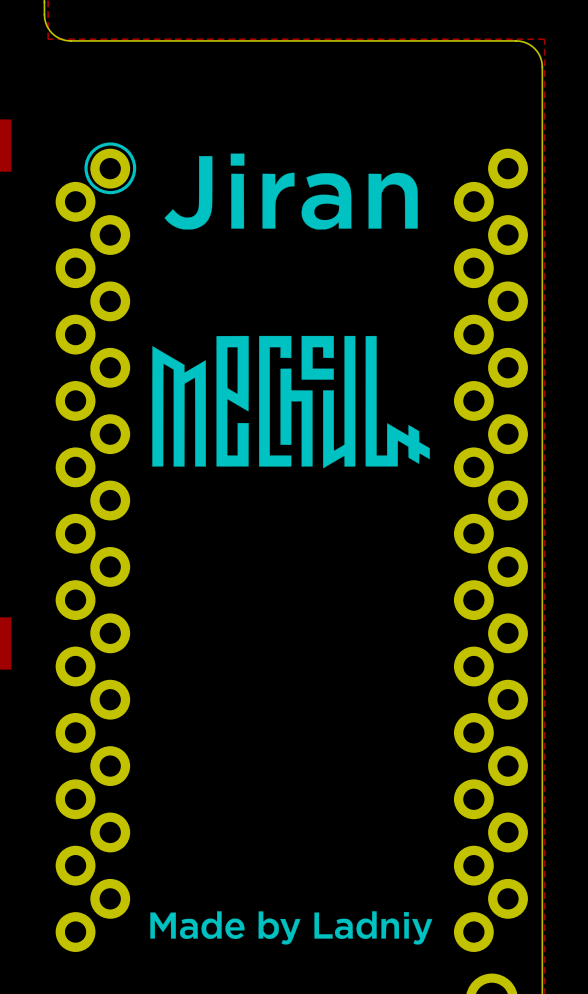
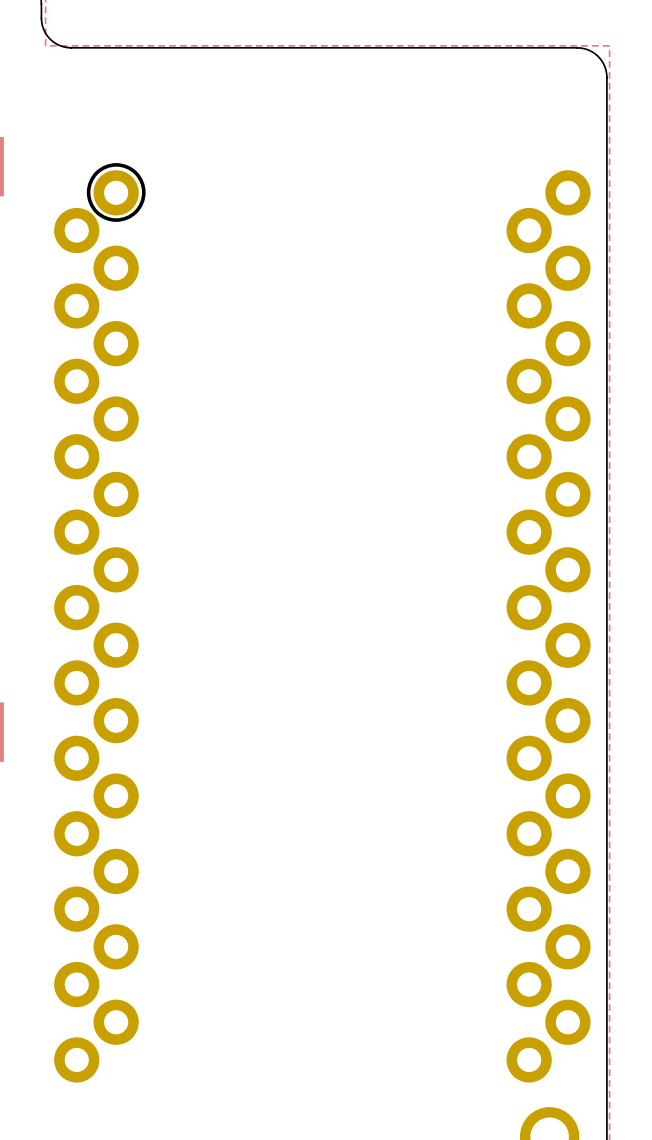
drawing: [150, 153, 433, 945] -> none

